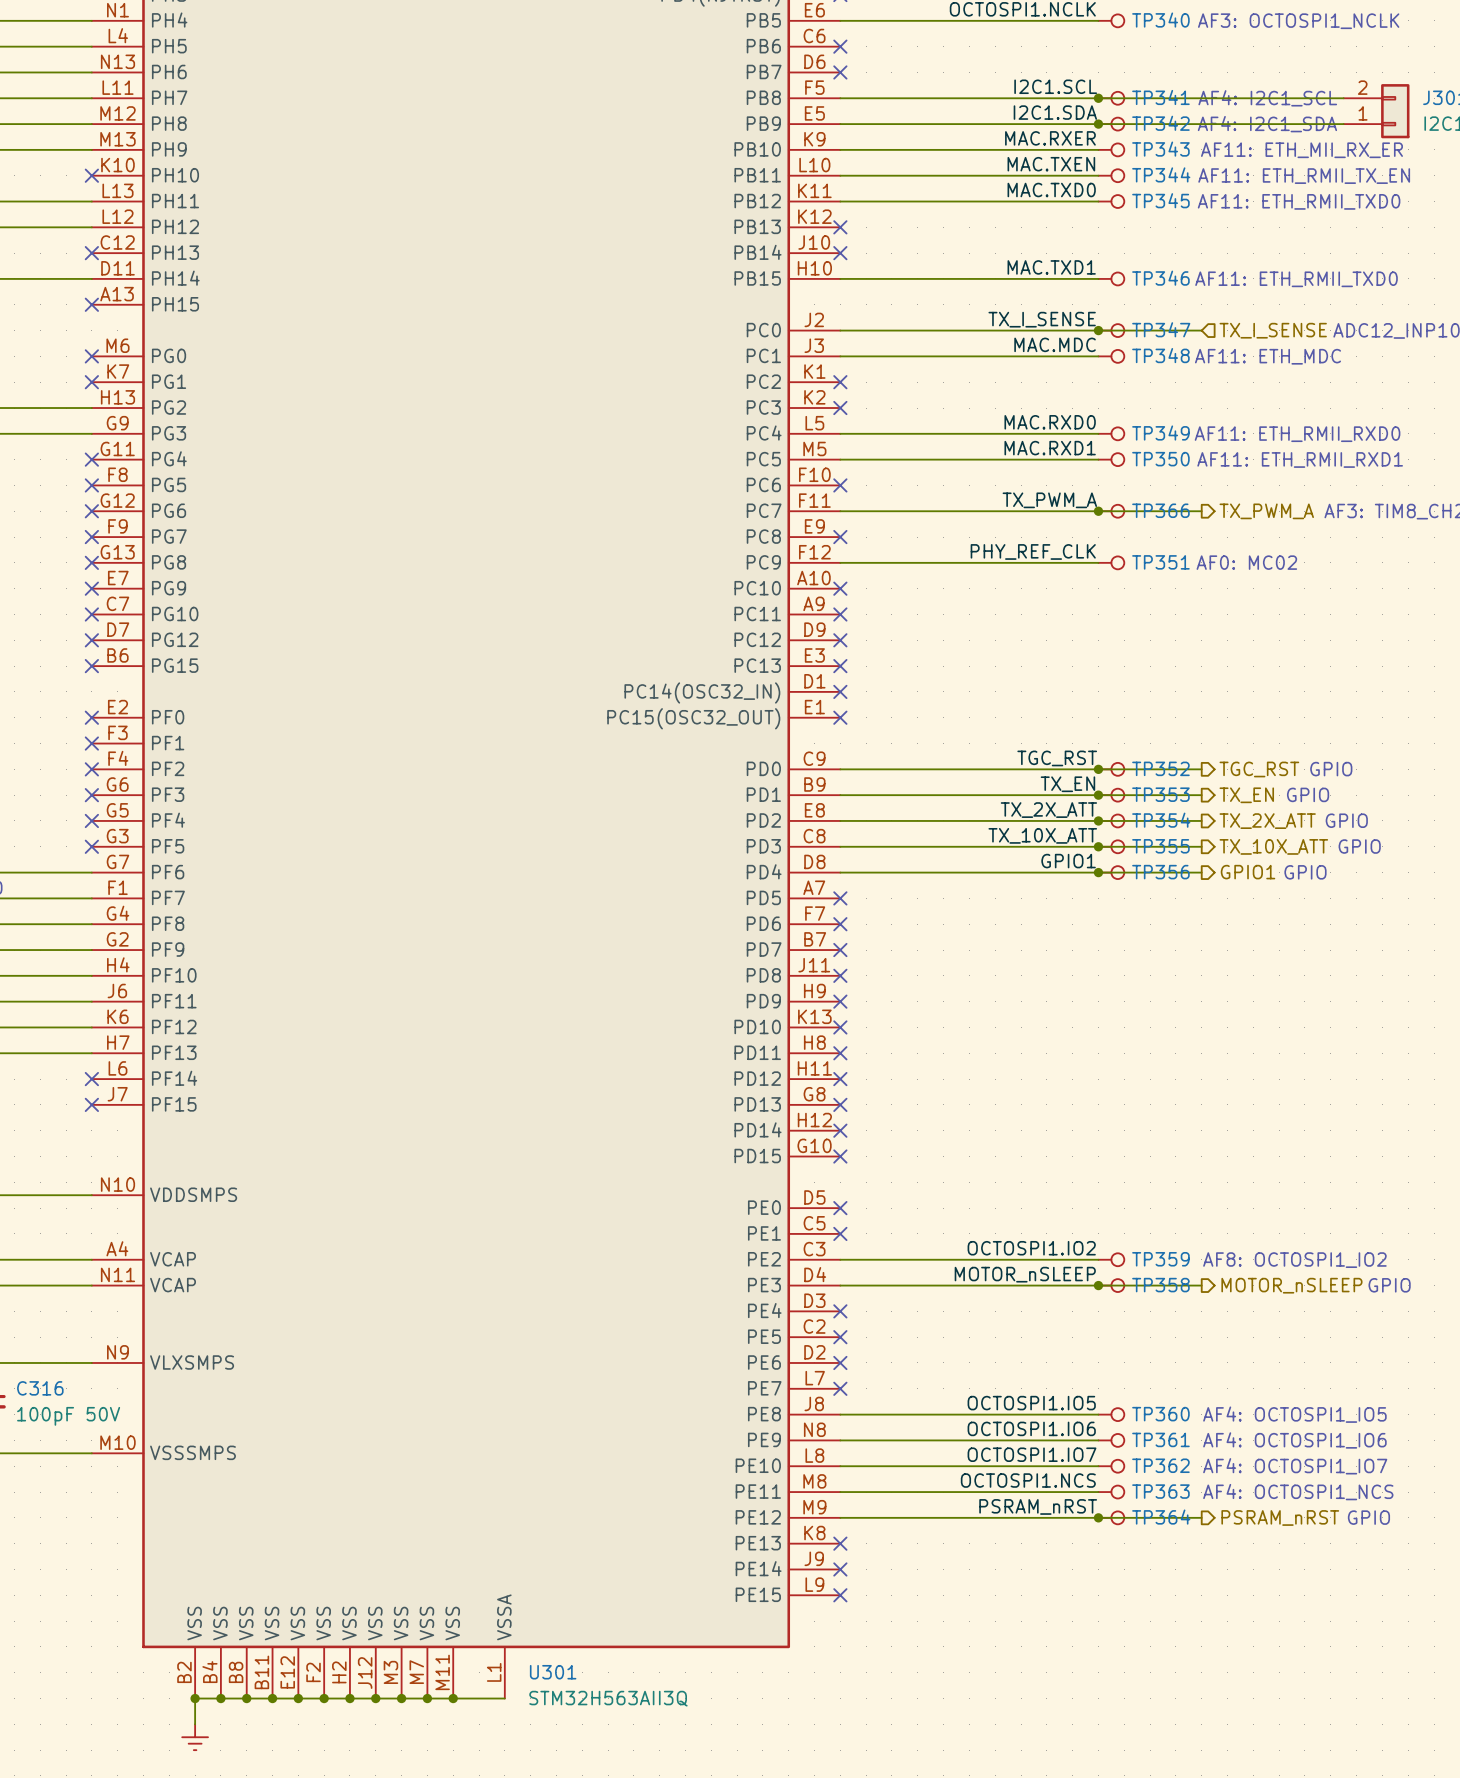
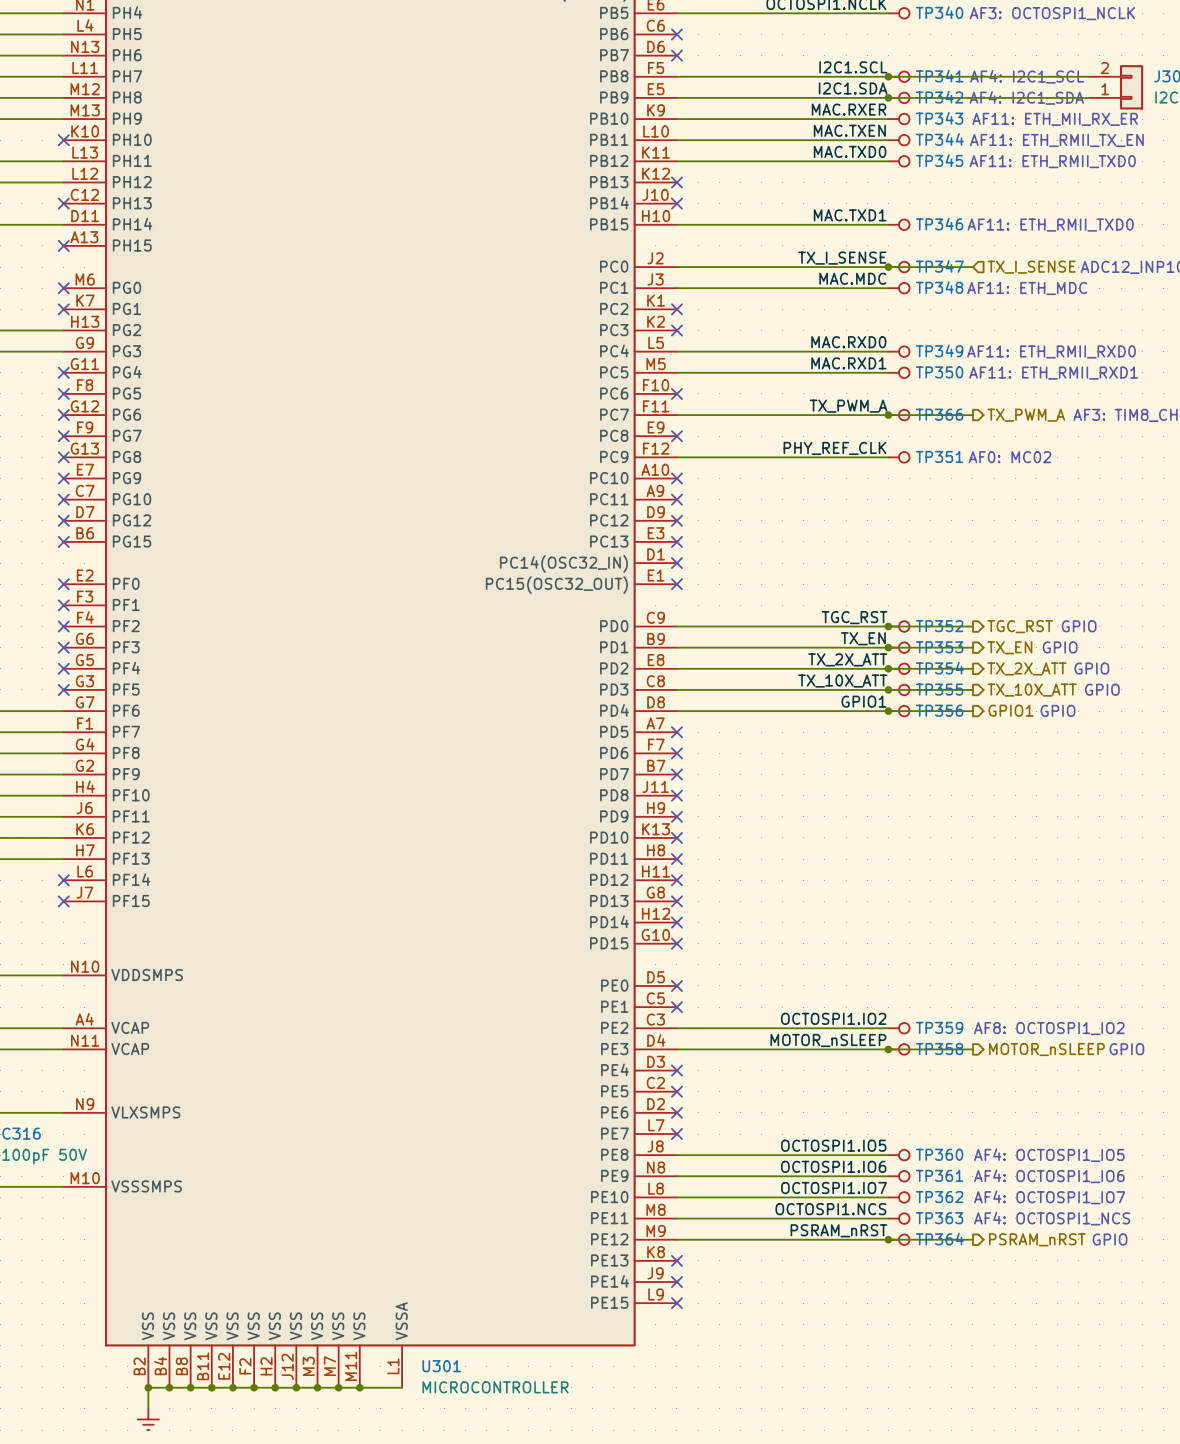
U301 value: STM32H563AII3Q (608, 1698) -> MICROCONTROLLER (495, 1387)

